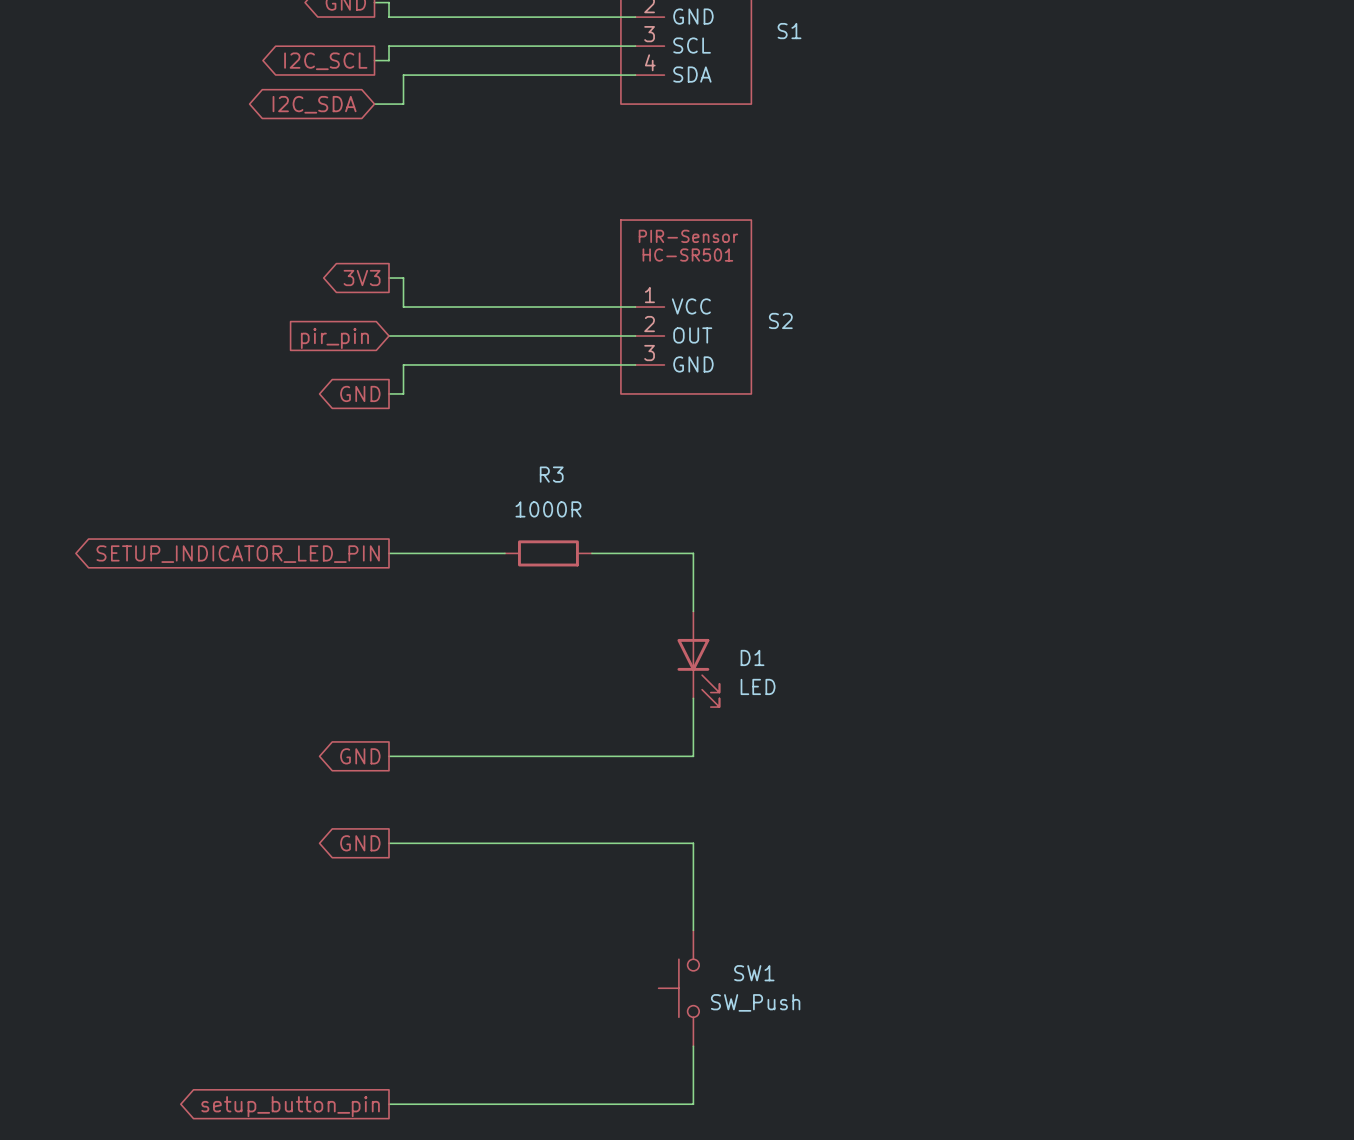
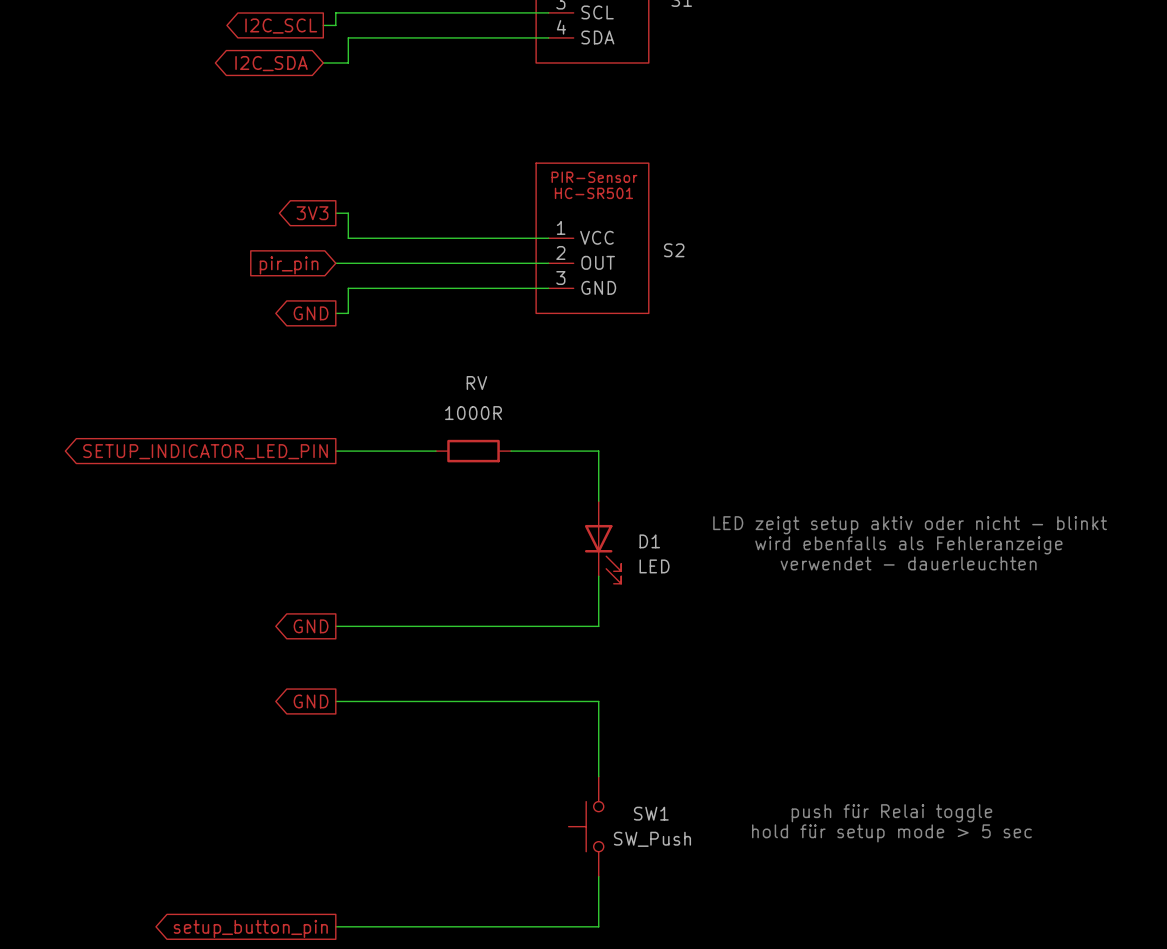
R3 name: R3 (551, 474) -> RV (476, 383)
text: none -> LED zeigt setup aktiv oder nicht - blinkt (910, 525)
text: none -> wird ebenfalls als Fehleranzeige (908, 545)
text: none -> verwendet - dauerleuchten (908, 563)
text: none -> push für Relai toggle (891, 813)
text: none -> hold für setup mode > 5 sec (891, 833)

